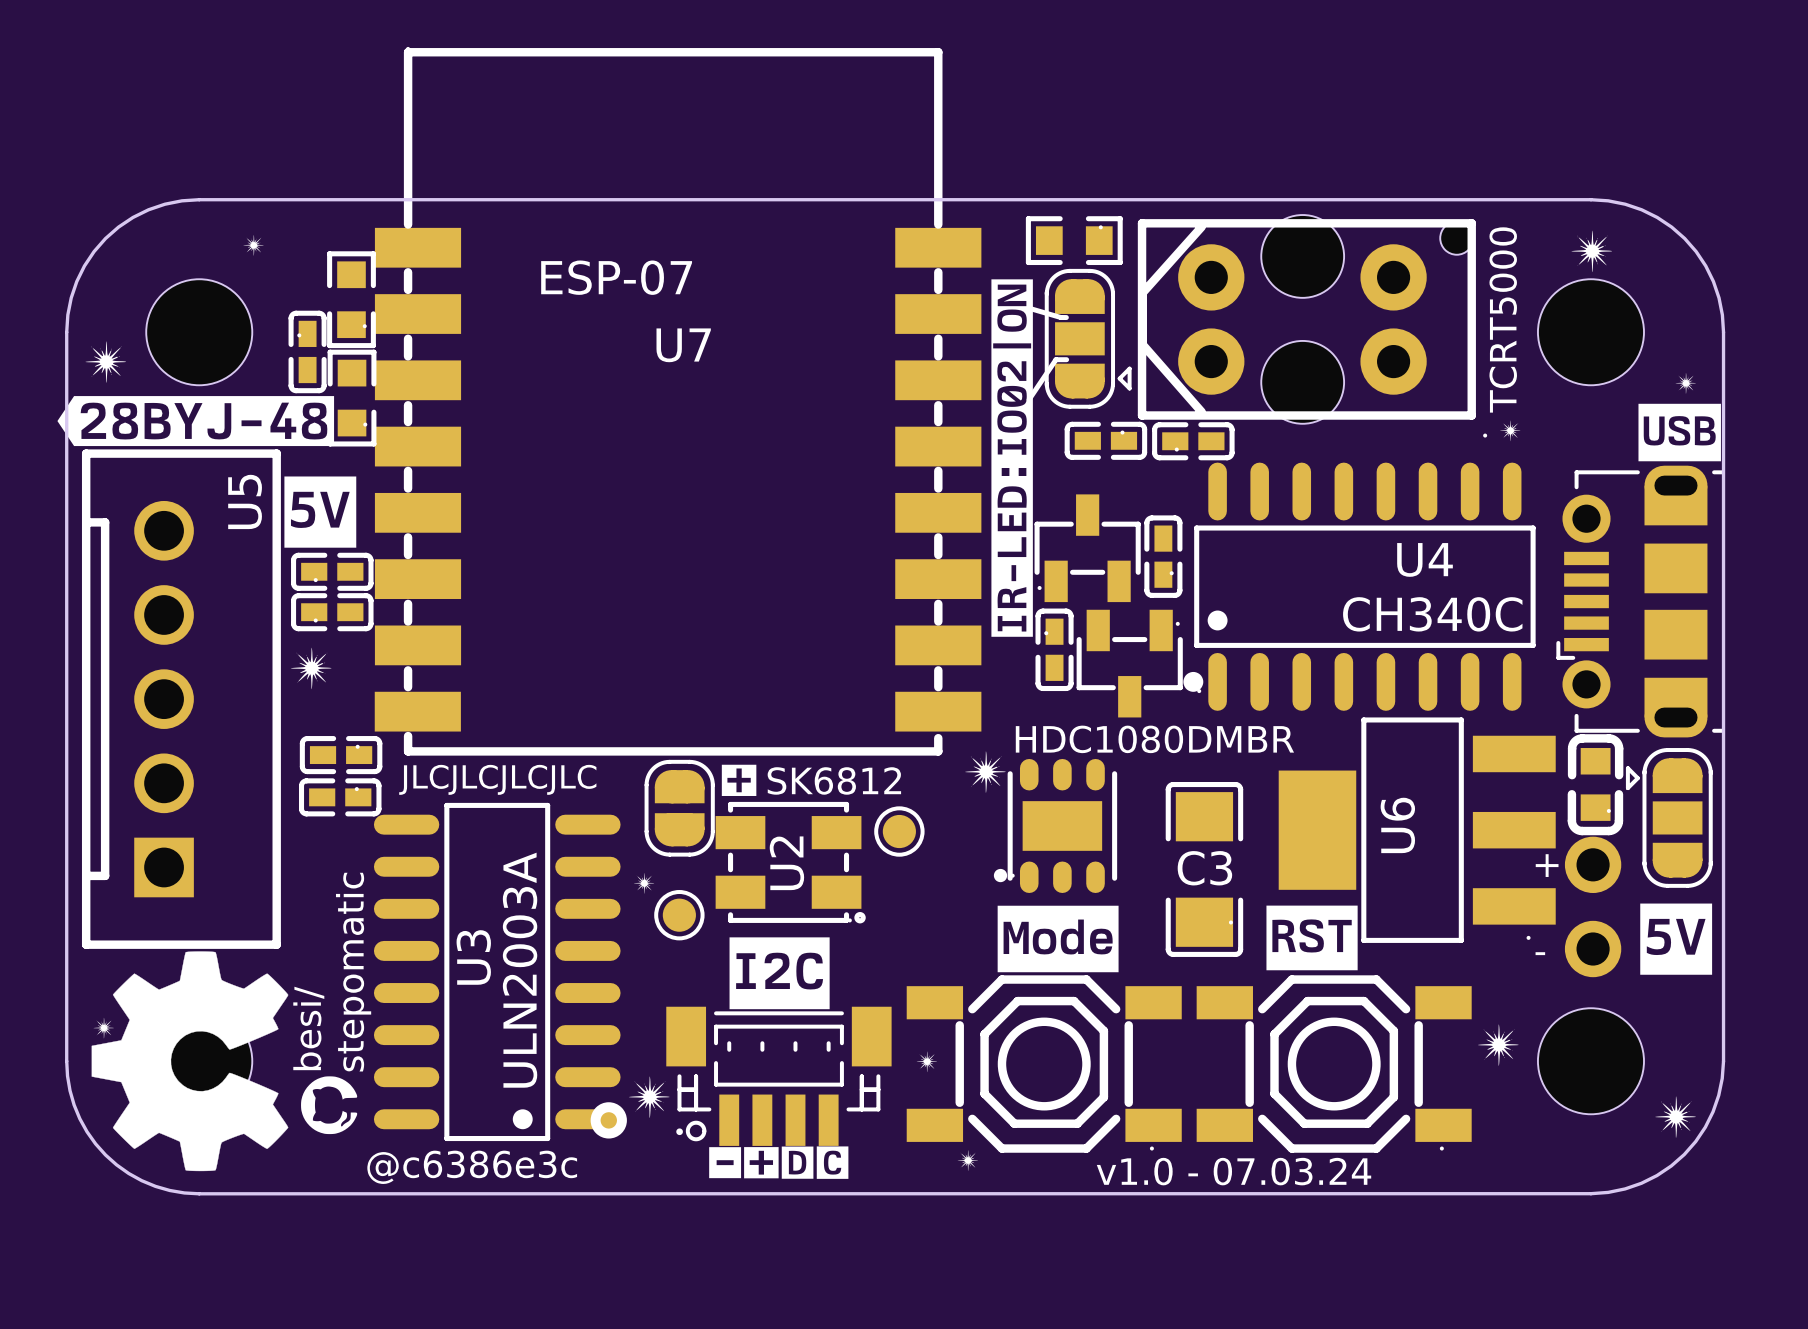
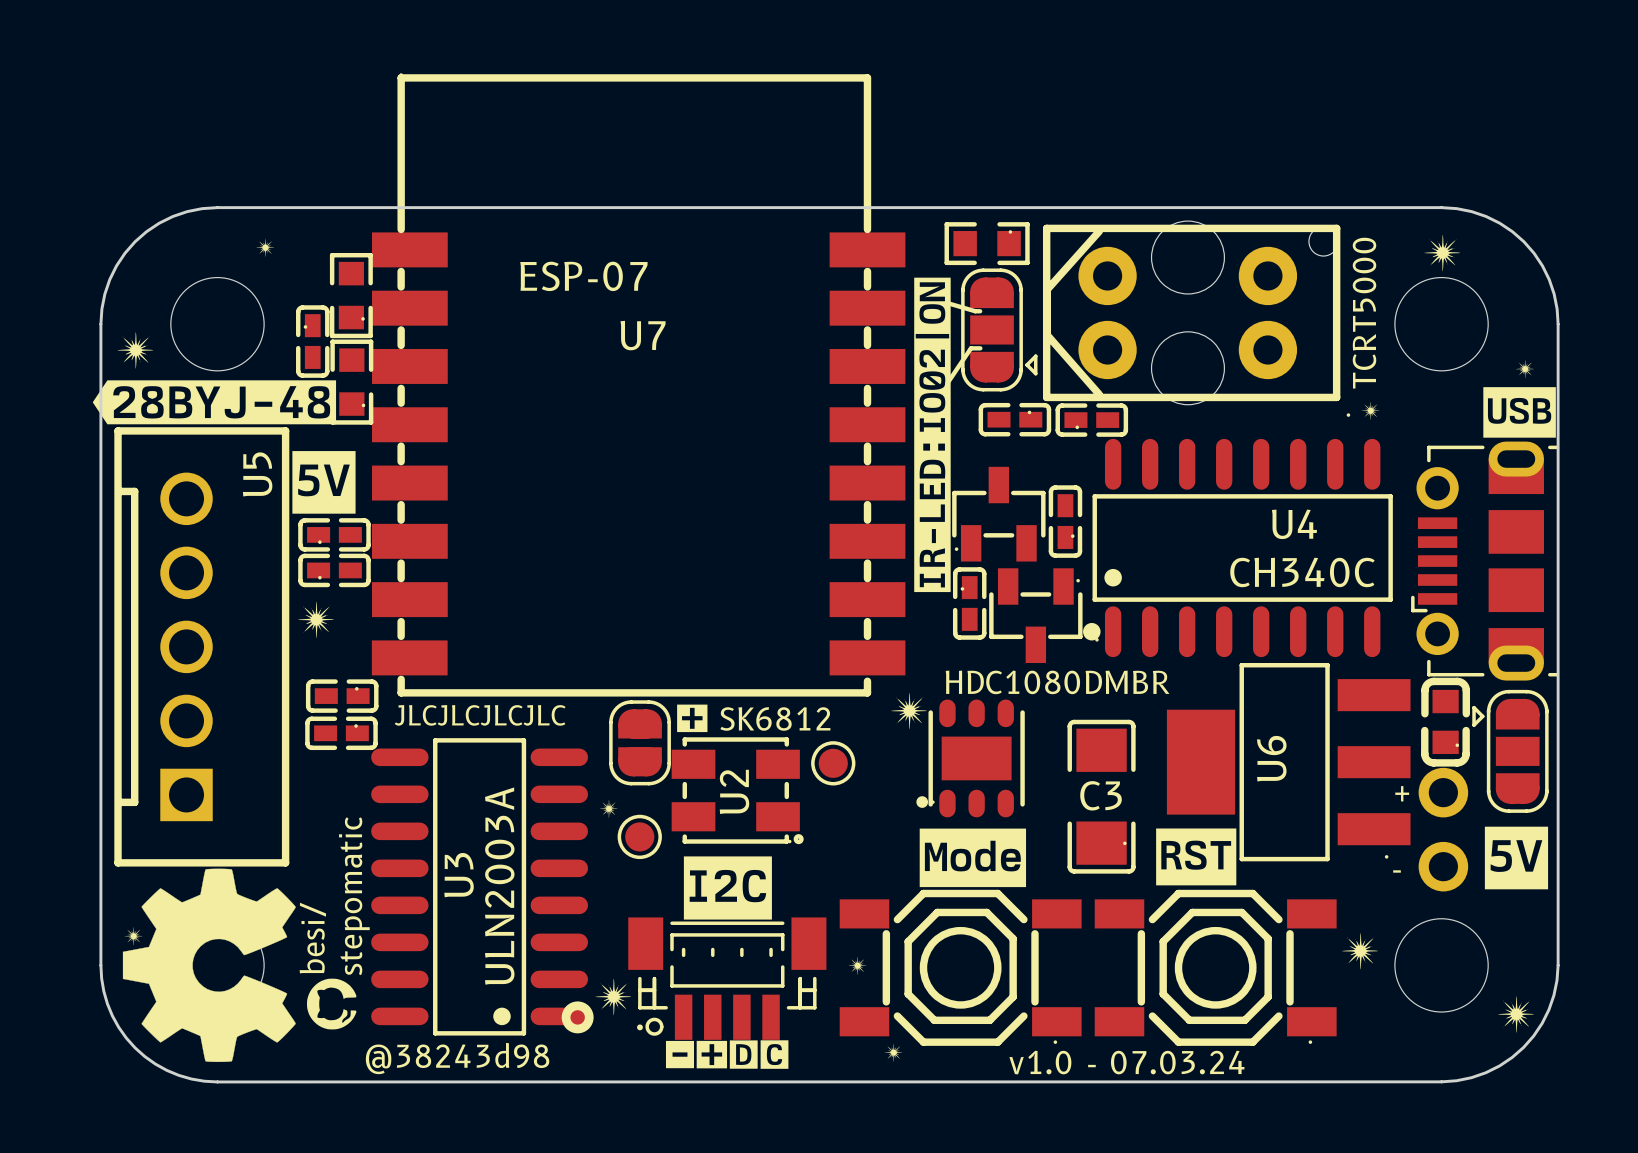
text: @c6386e3c (472, 1167) -> @38243d98 (457, 1058)

